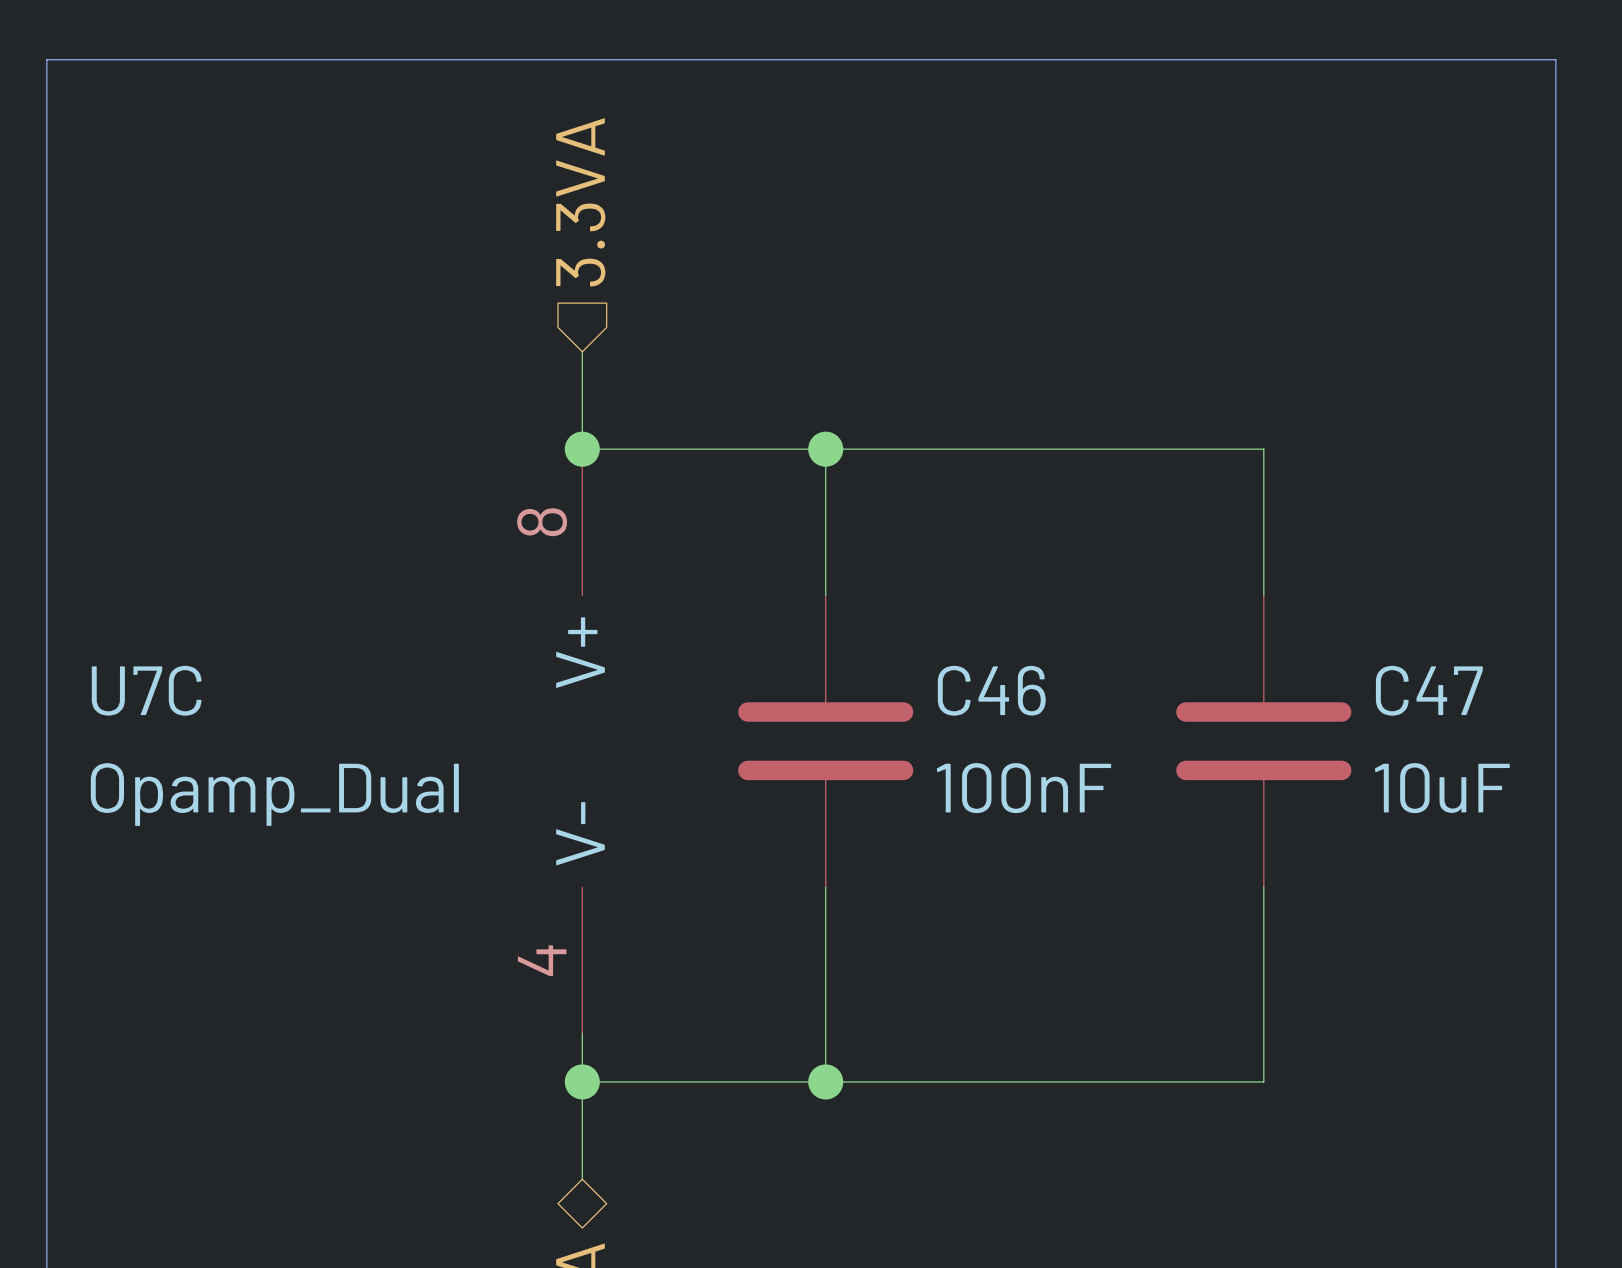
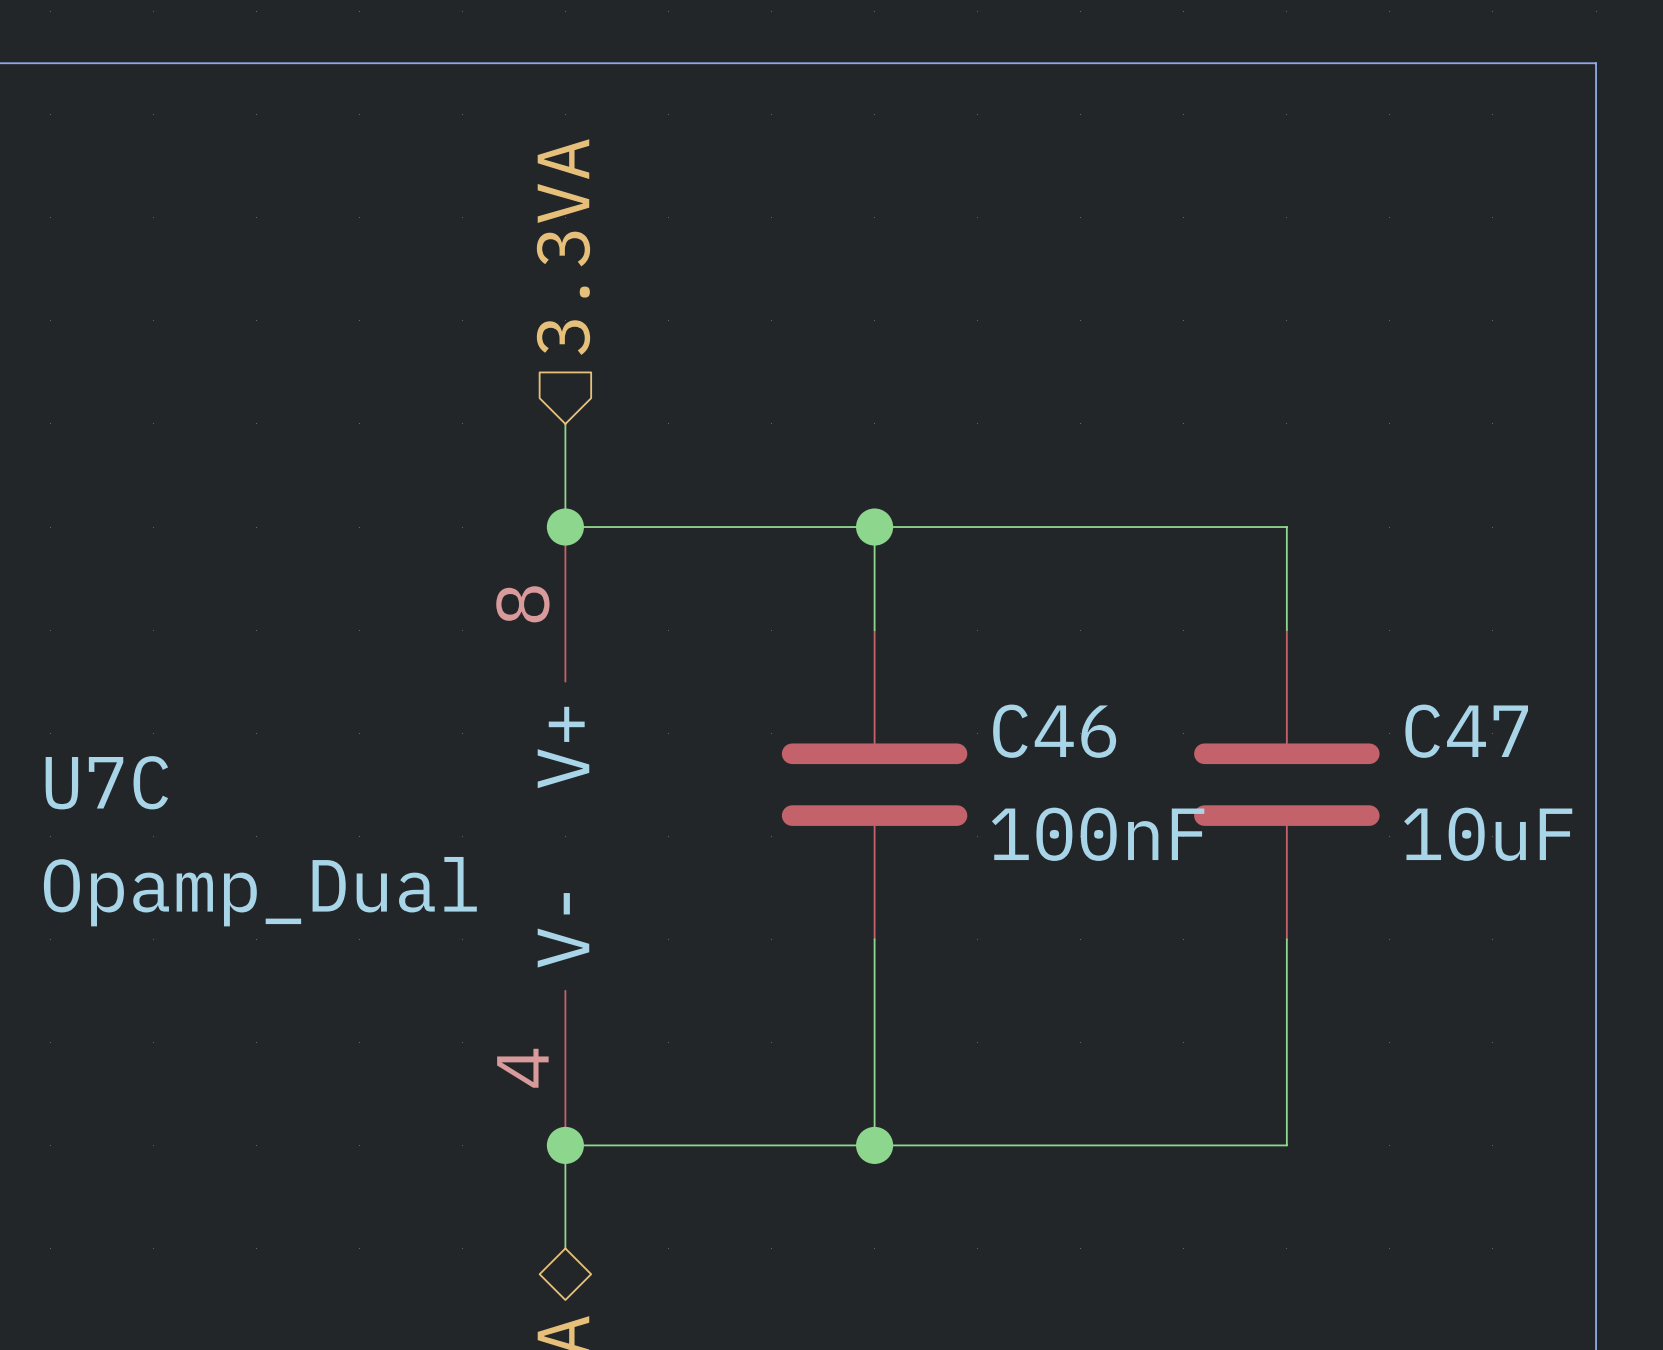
hierarchical label position: 3.3VA (580, 202) -> 3.3VA (563, 247)
wire: (582, 351) (582, 400) -> none
wire: (582, 449) (1263, 449) (1263, 497) -> (565, 475) (565, 527) (1286, 527)
junction position: (582, 449) -> (565, 527)
wire: (825, 449) (825, 595) -> none
junction position: (825, 449) -> (874, 527)
wire: none -> (874, 527) (874, 630)
U7C position: (582, 741) -> (565, 836)
C46 position: (825, 741) -> (874, 784)
wire: (825, 887) (825, 1081) -> (874, 939) (874, 1145)
junction position: (825, 1081) -> (874, 1145)

